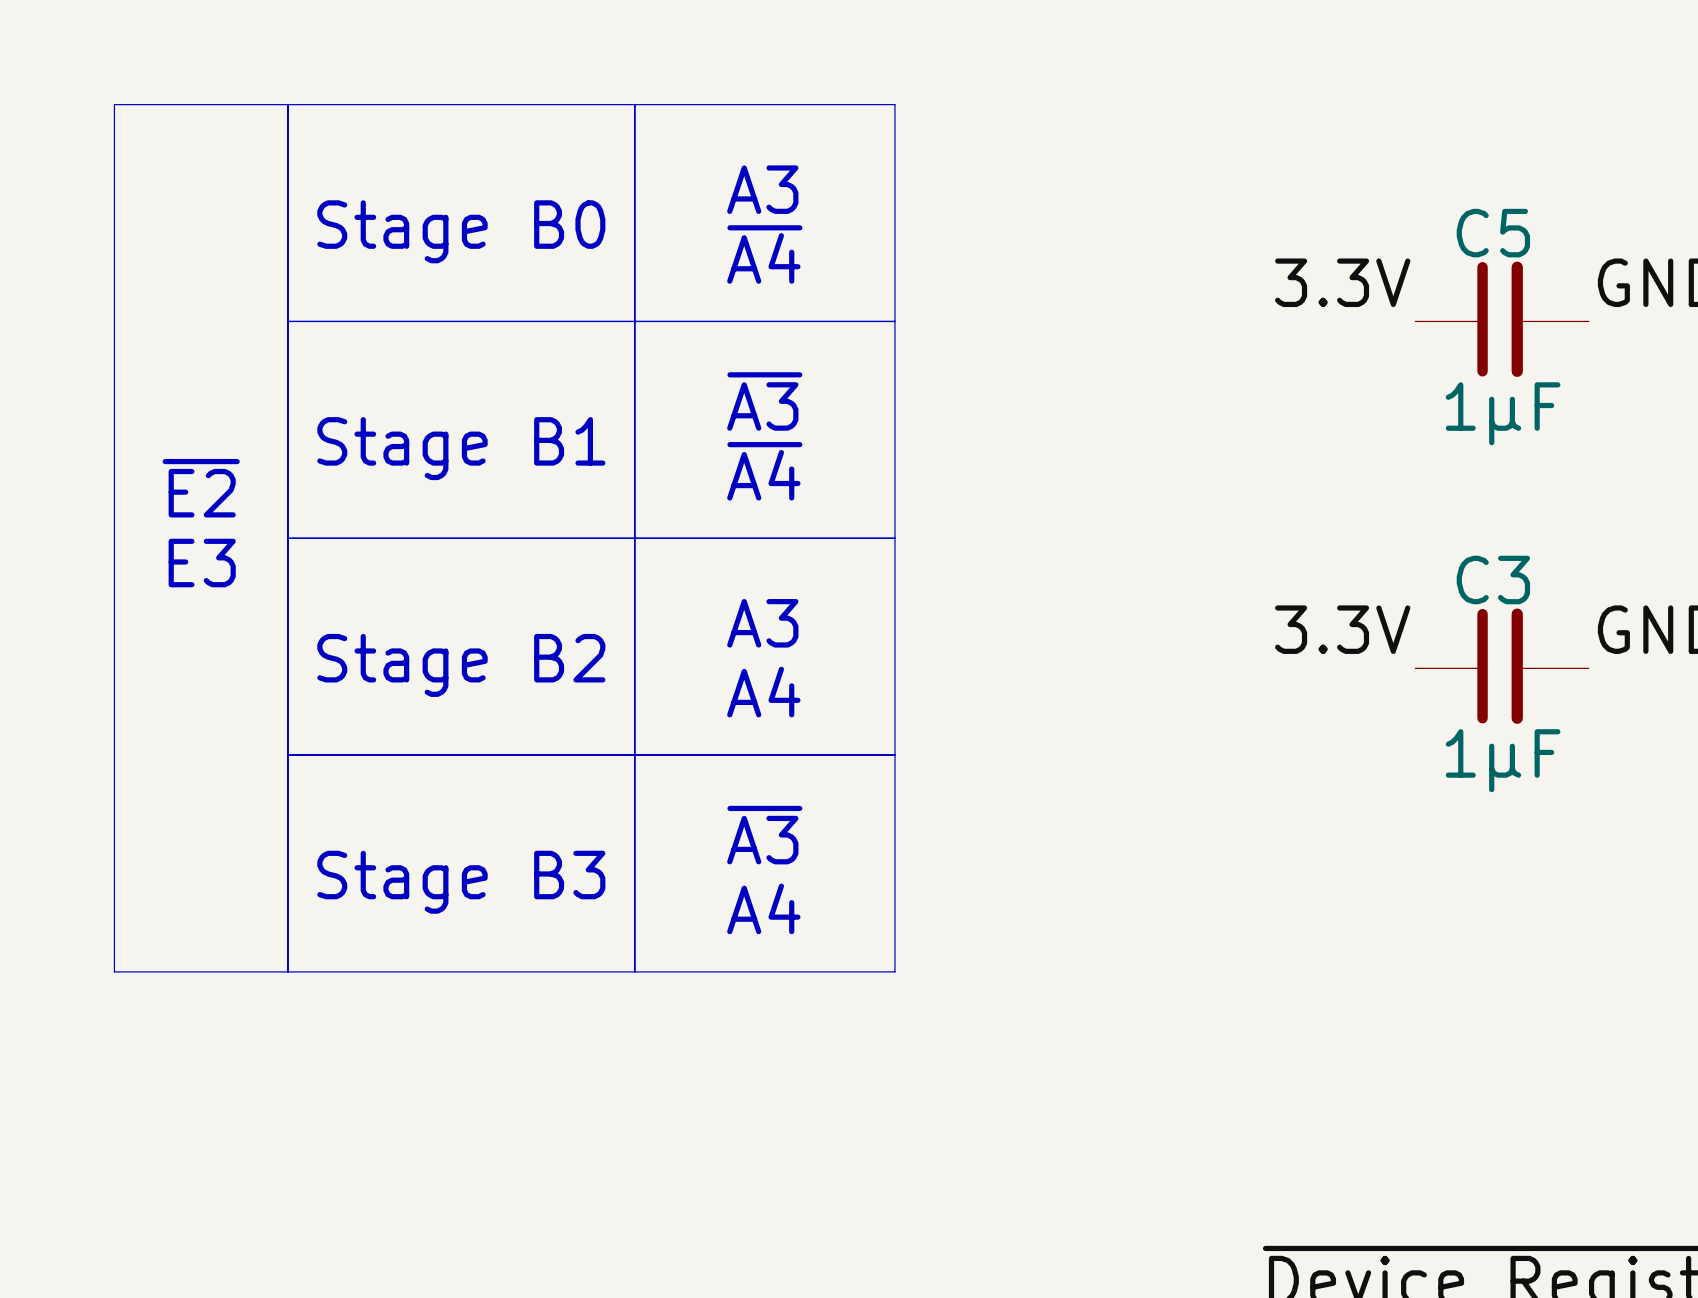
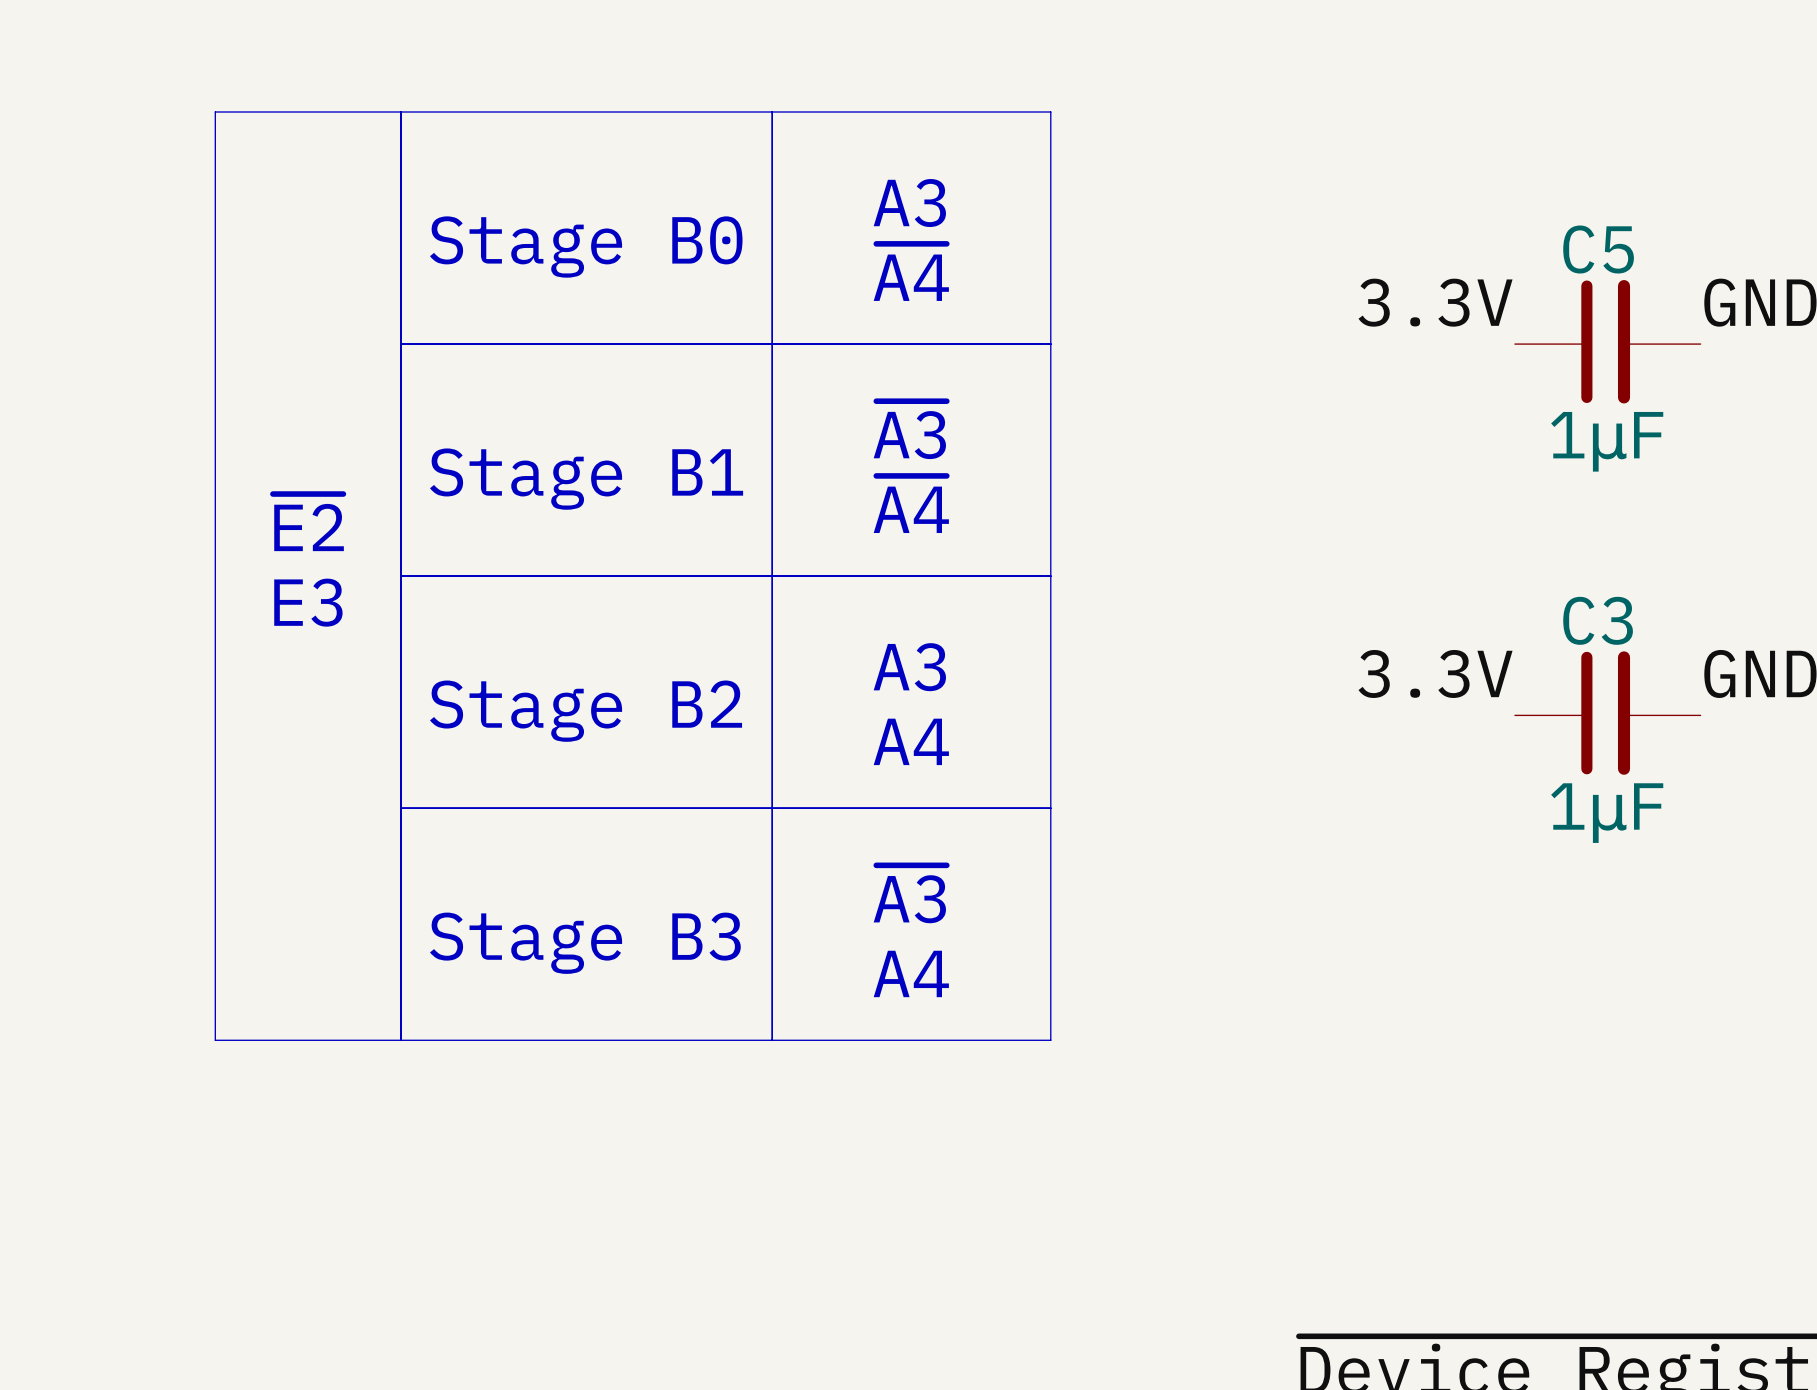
line: (201, 104) (114, 104) (114, 971) (201, 971) -> (215, 112) (215, 1040)
line: (287, 104) (287, 971) -> (400, 112) (400, 1040)
line: (634, 104) (634, 971) -> (772, 112) (772, 1040)
line: (894, 104) (894, 971) -> (957, 112) (1050, 112) (1050, 1040) (957, 1040)
text position: A3 (762, 189) -> A3 (909, 203)
text position: Stage B0 (461, 231) -> Stage B0 (586, 247)
text position: ~{A4} (764, 254) -> ~{A4} (911, 272)
line: (287, 321) (374, 321) -> (957, 344) (1050, 344)
text position: ~{A3} (764, 401) -> ~{A3} (910, 430)
text position: Stage B1 (461, 448) -> Stage B1 (586, 479)
text position: ~{A4} (764, 471) -> ~{A4} (911, 504)
text position: ~{E2} (201, 488) -> ~{E2} (308, 522)
line: (287, 538) (374, 538) -> (957, 576) (1050, 576)
text position: E3 (202, 563) -> E3 (308, 602)
text position: A3 (762, 623) -> A3 (909, 667)
text position: Stage B2 (461, 665) -> Stage B2 (586, 711)
text position: A4 (763, 692) -> A4 (911, 741)
line: (287, 755) (374, 755) -> (957, 808) (1050, 808)
text position: ~{A3} (764, 835) -> ~{A3} (910, 894)
text position: Stage B3 (461, 882) -> Stage B3 (585, 943)
text position: A4 (763, 908) -> A4 (911, 973)

